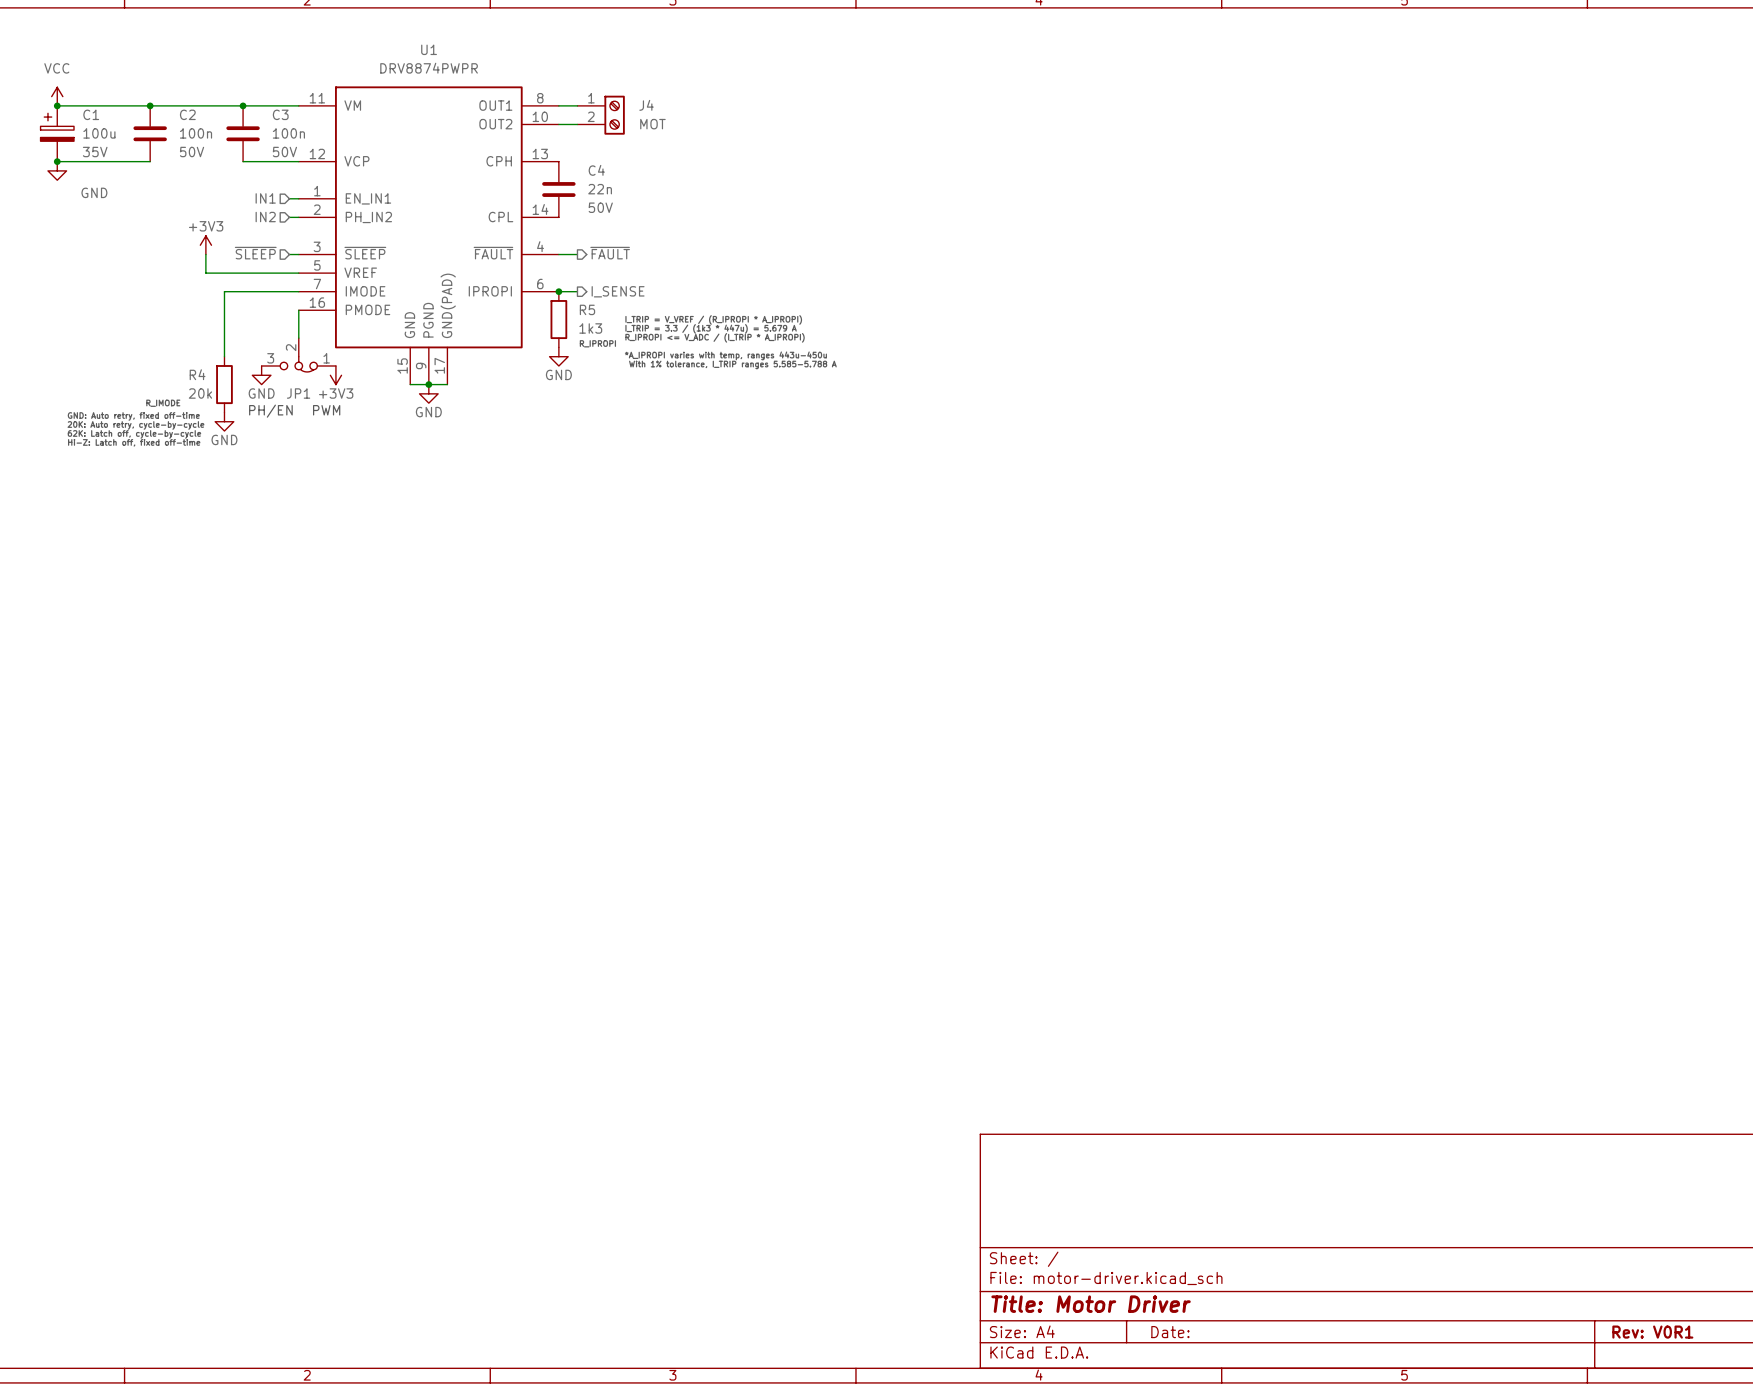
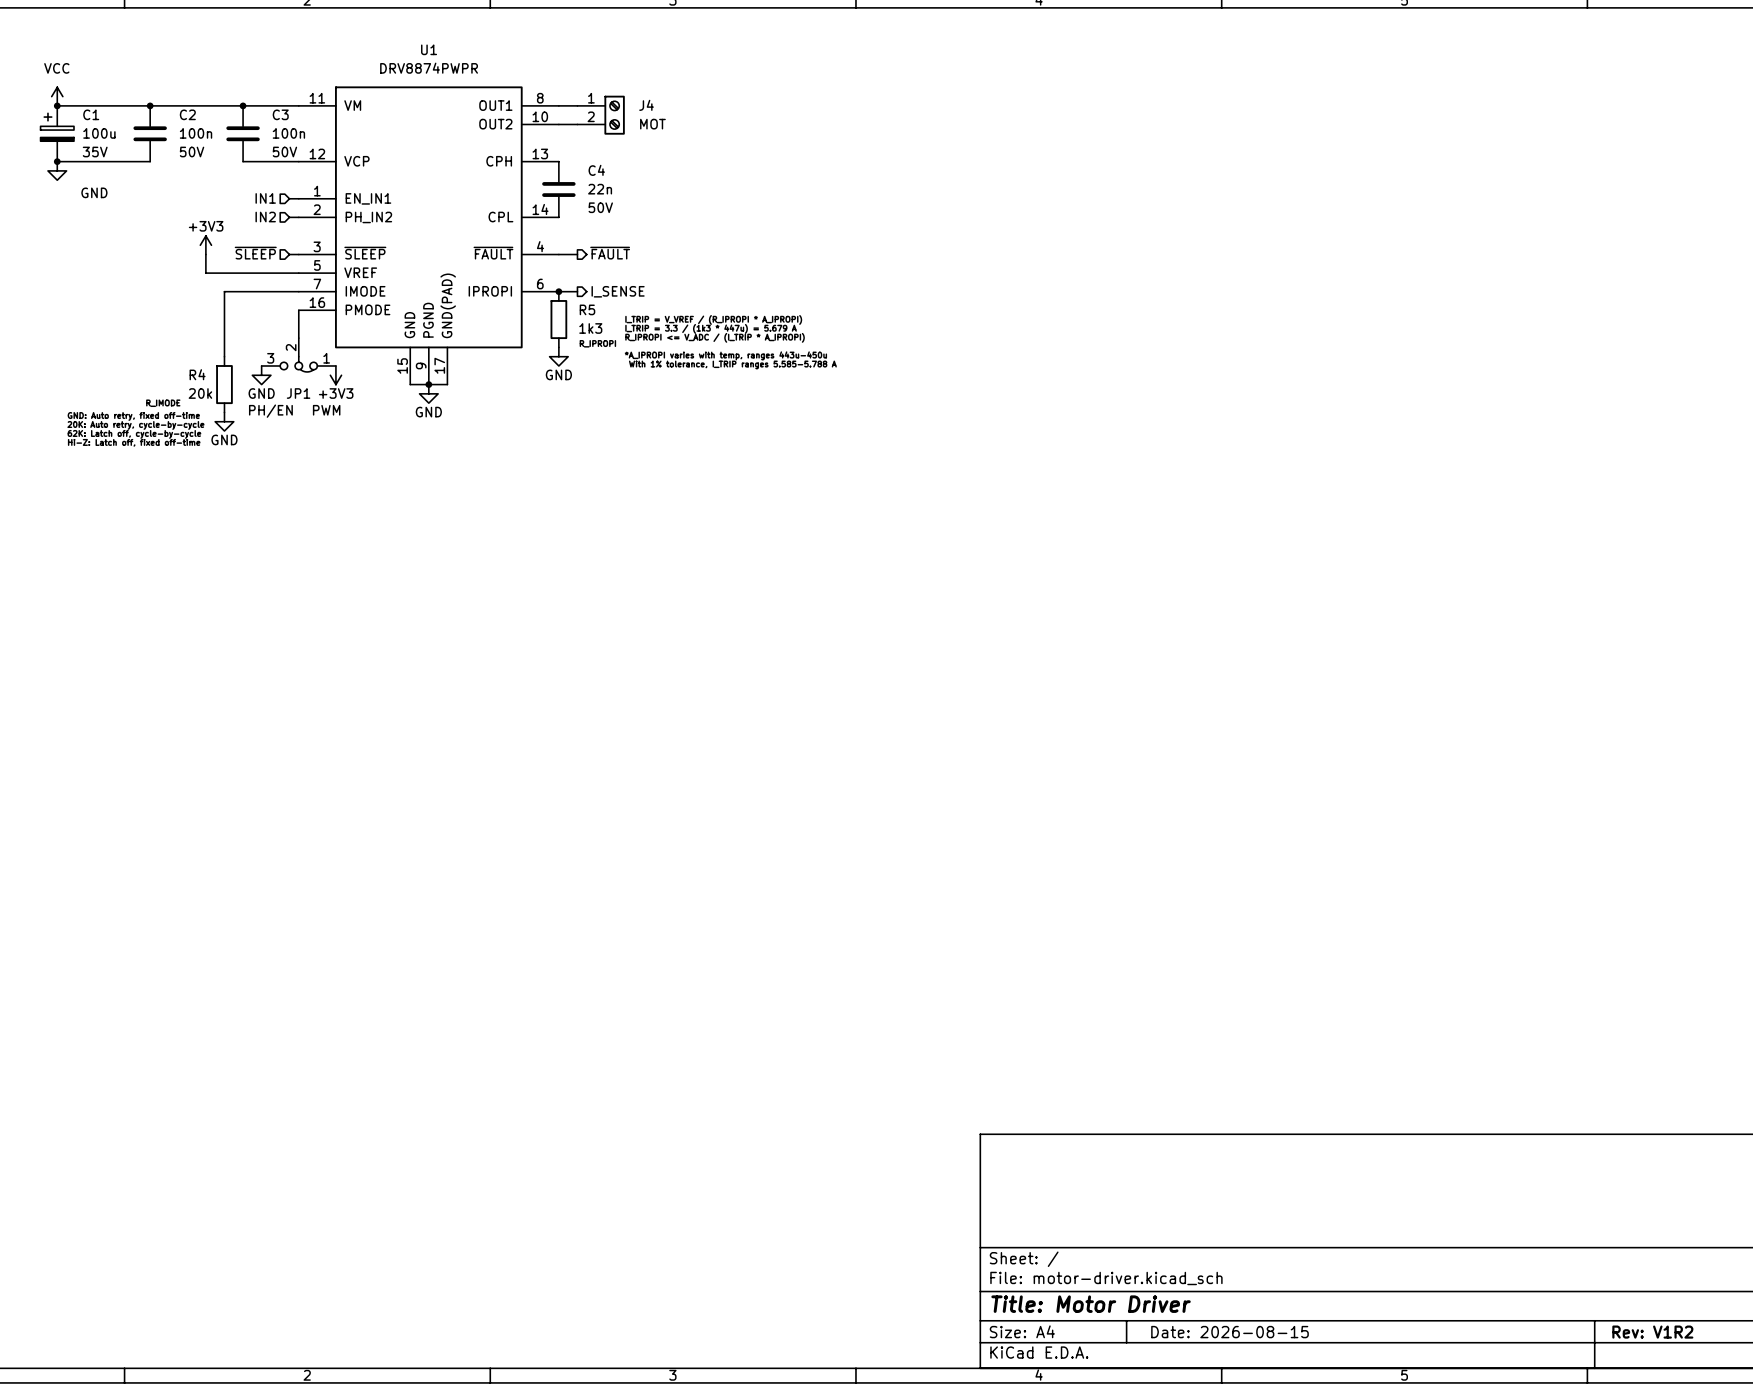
title block: Date: (1170, 1332) -> Date: 2026-08-15 (1230, 1332)
title block: Rev: V0R1 (1652, 1332) -> Rev: V1R2 (1652, 1332)

